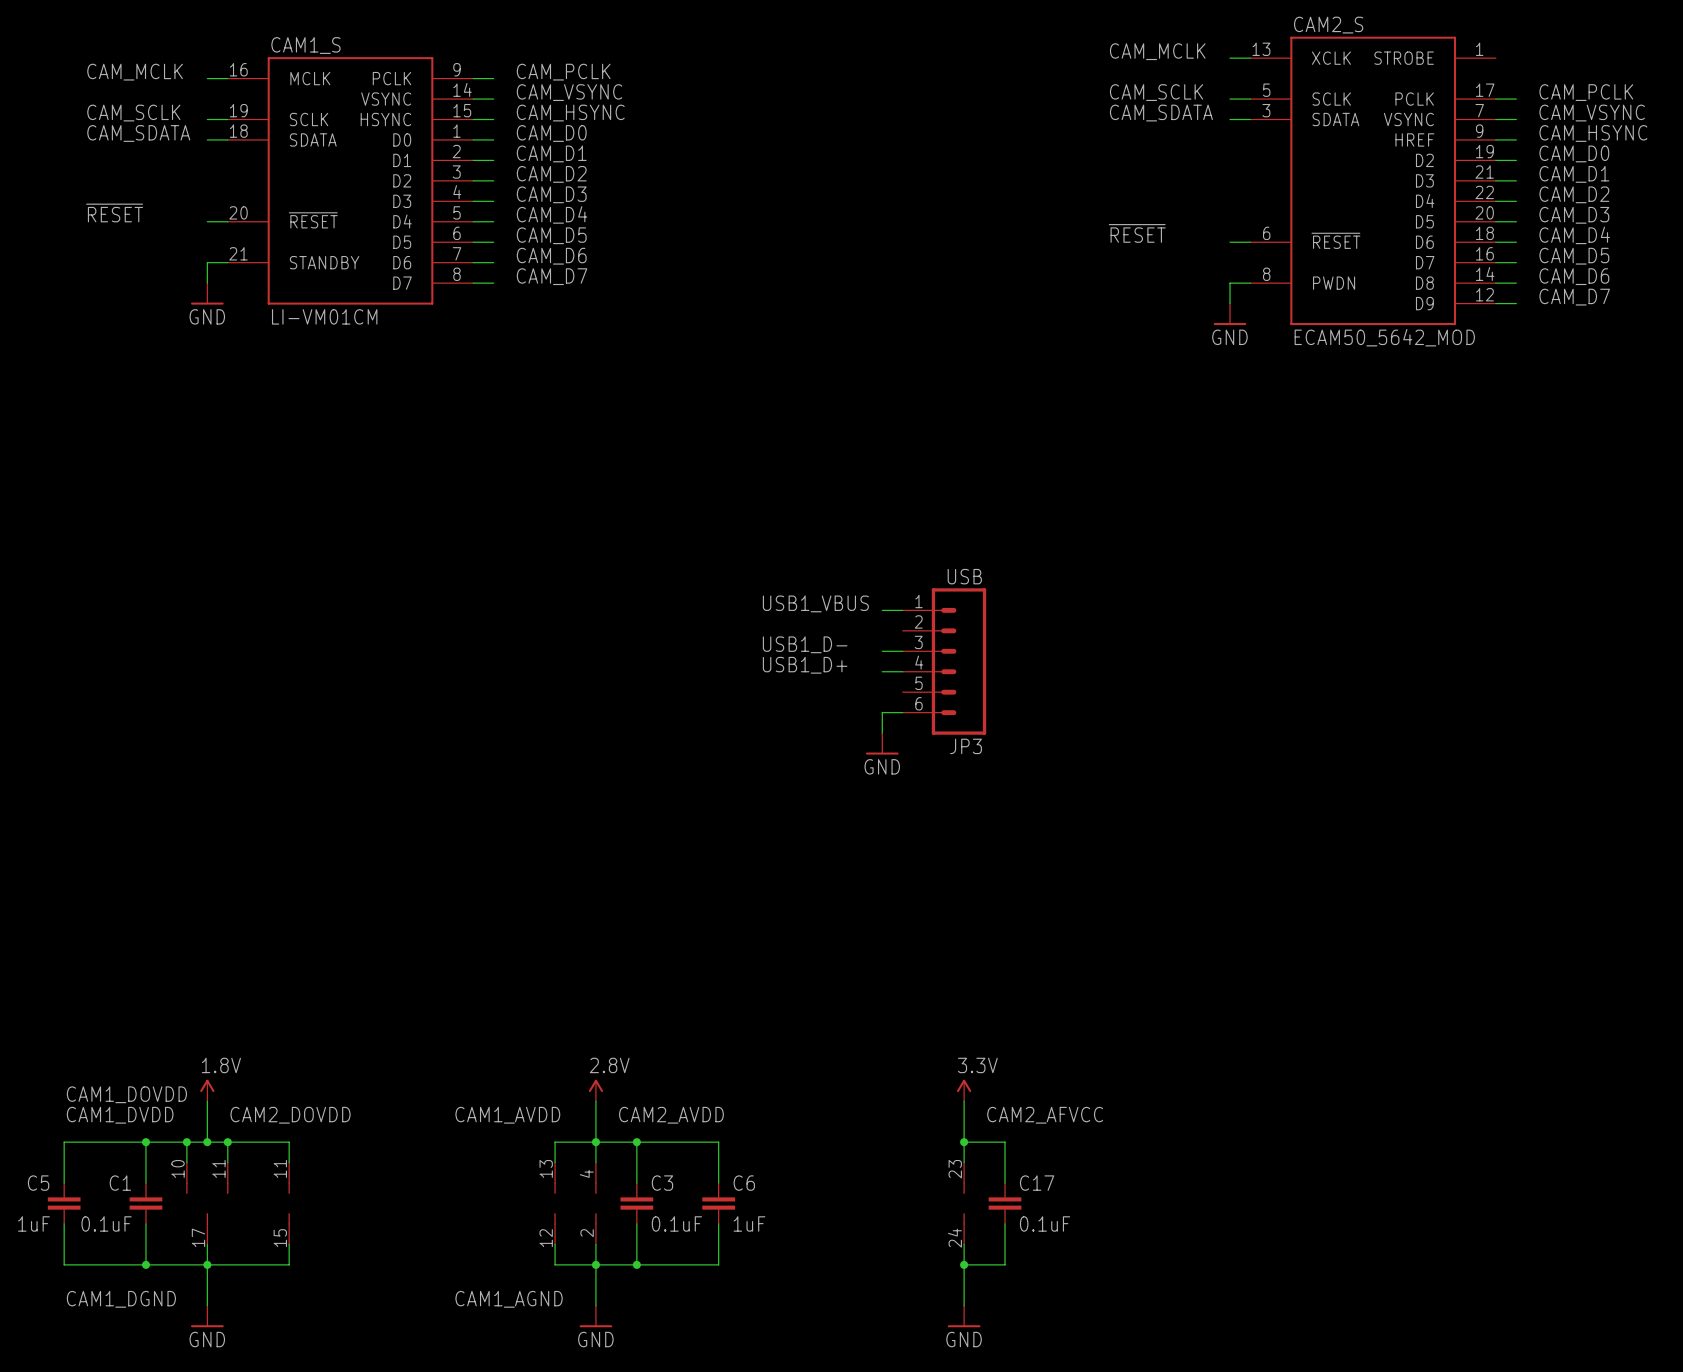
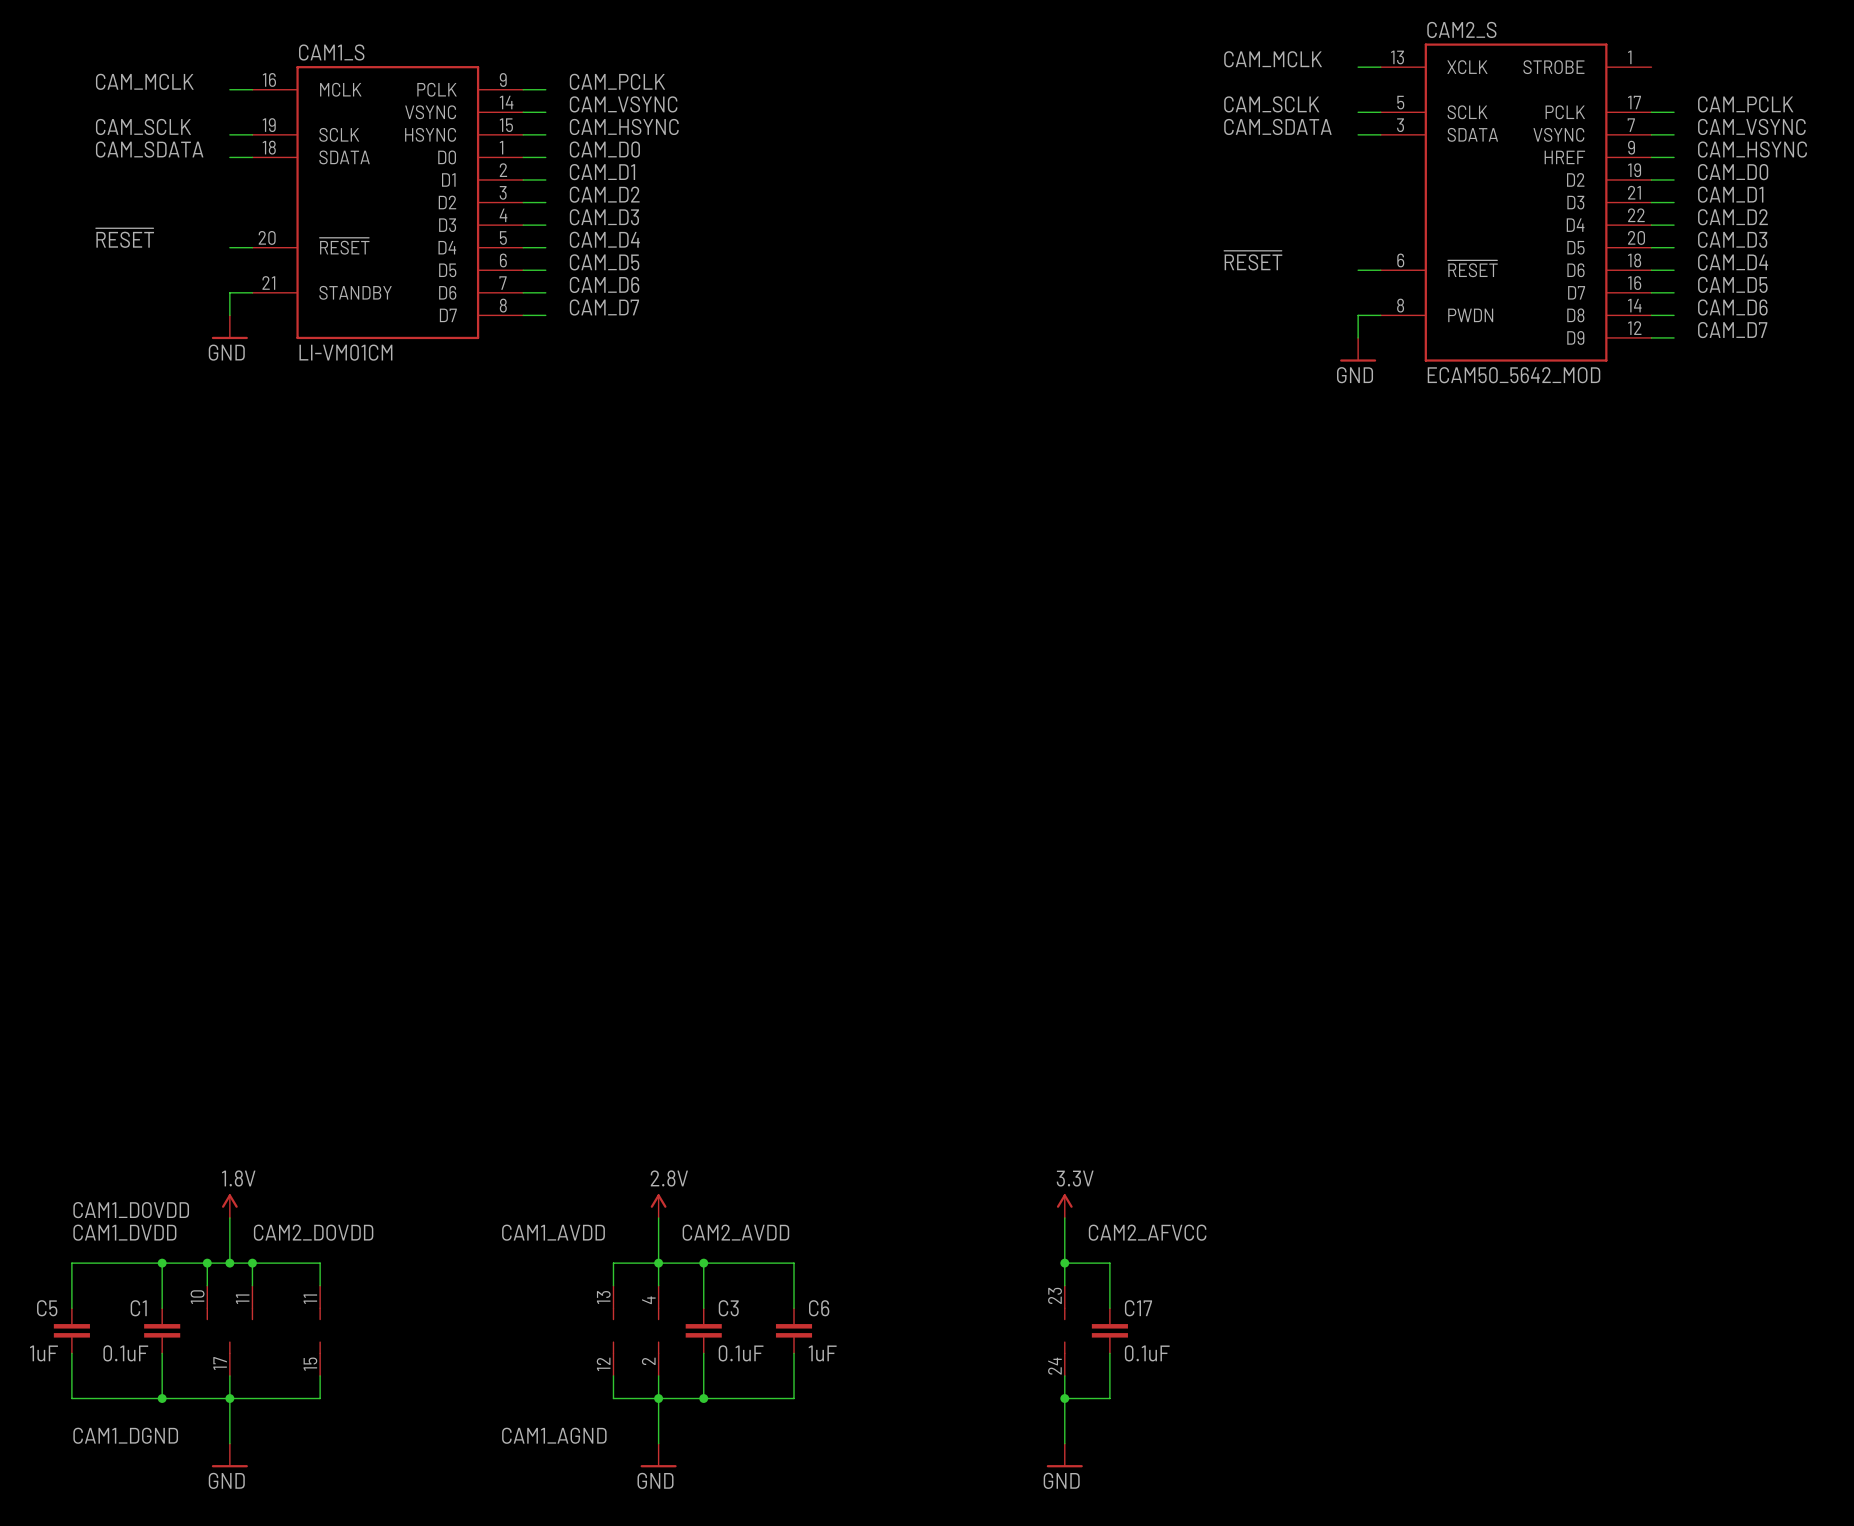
label: USB1_VBUS (815, 603) -> none
wire: (882, 610) (902, 610) -> none
label: USB1_D- (805, 644) -> none
wire: (882, 651) (902, 651) -> none
JP3: USB (944, 661) -> none
label: USB1_D+ (805, 665) -> none
wire: (882, 671) (902, 671) -> none
wire: (902, 712) (882, 712) (882, 733) -> none
power symbol: GND (882, 743) -> none

